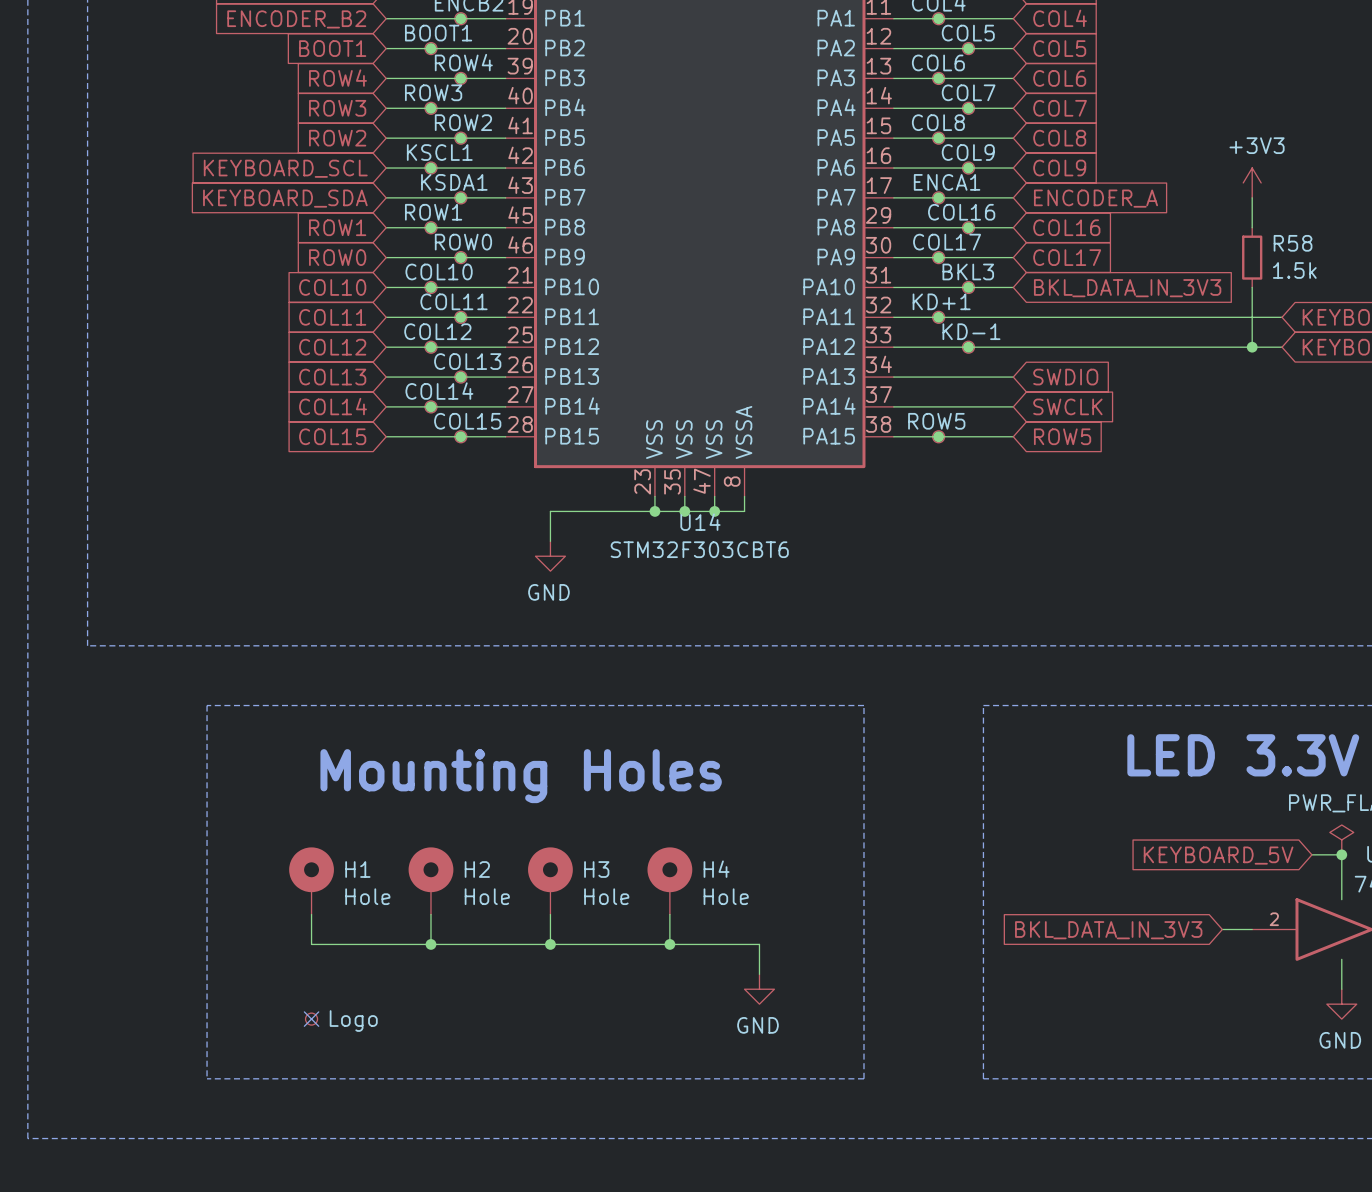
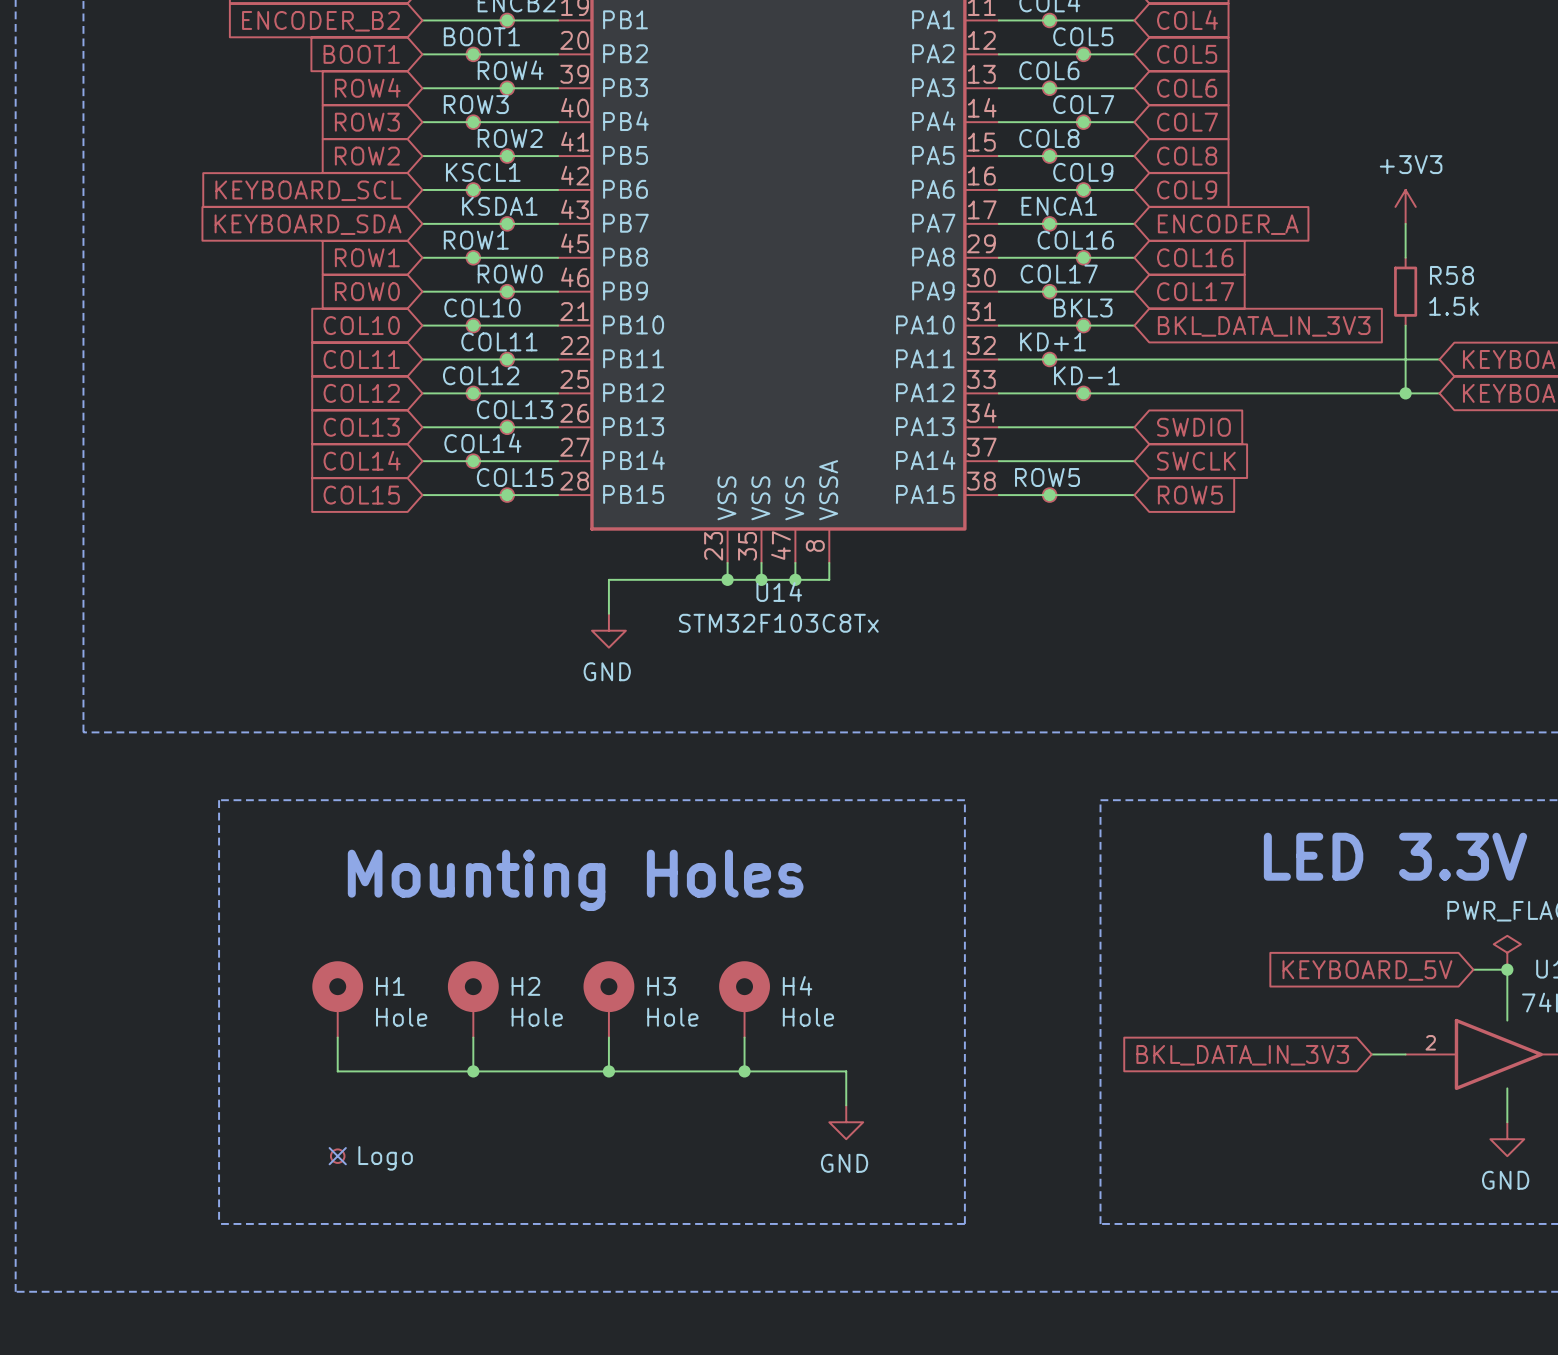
U14 value: STM32F303CBT6 (699, 549) -> STM32F103C8Tx (778, 623)

